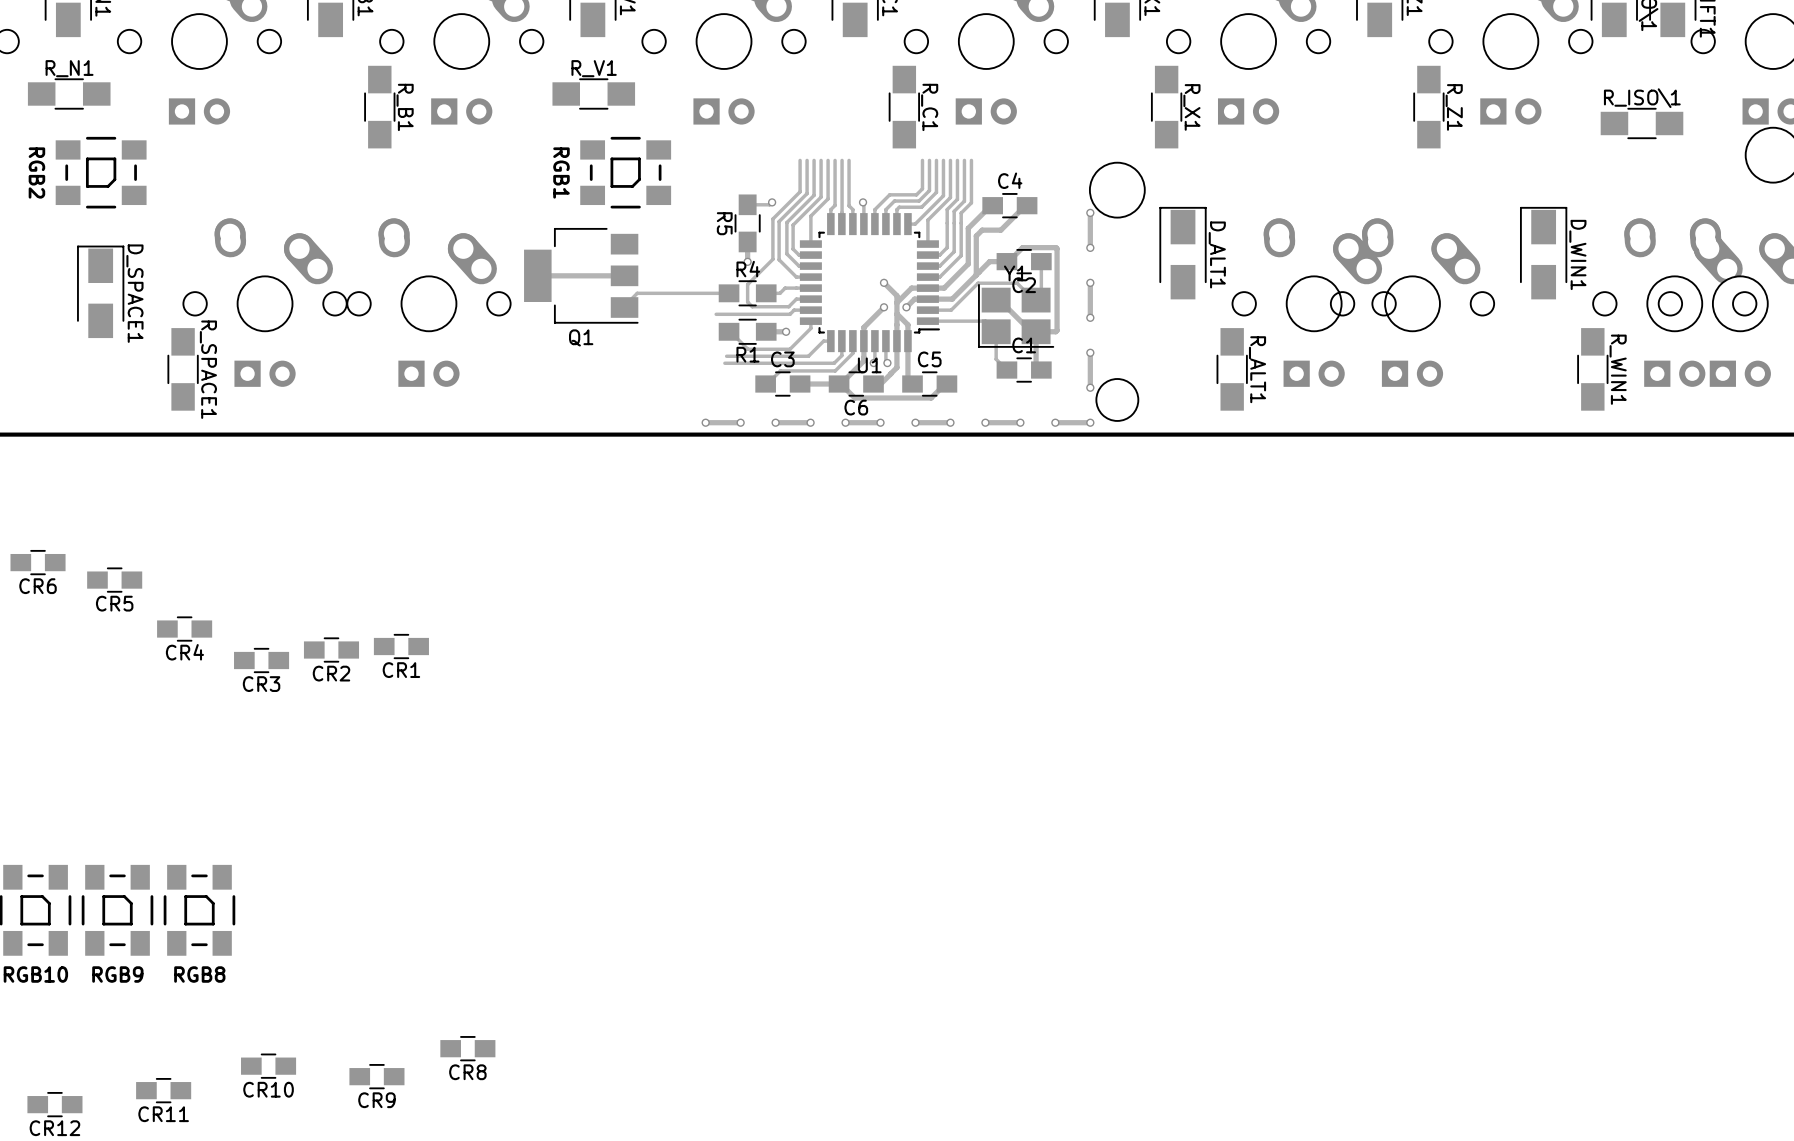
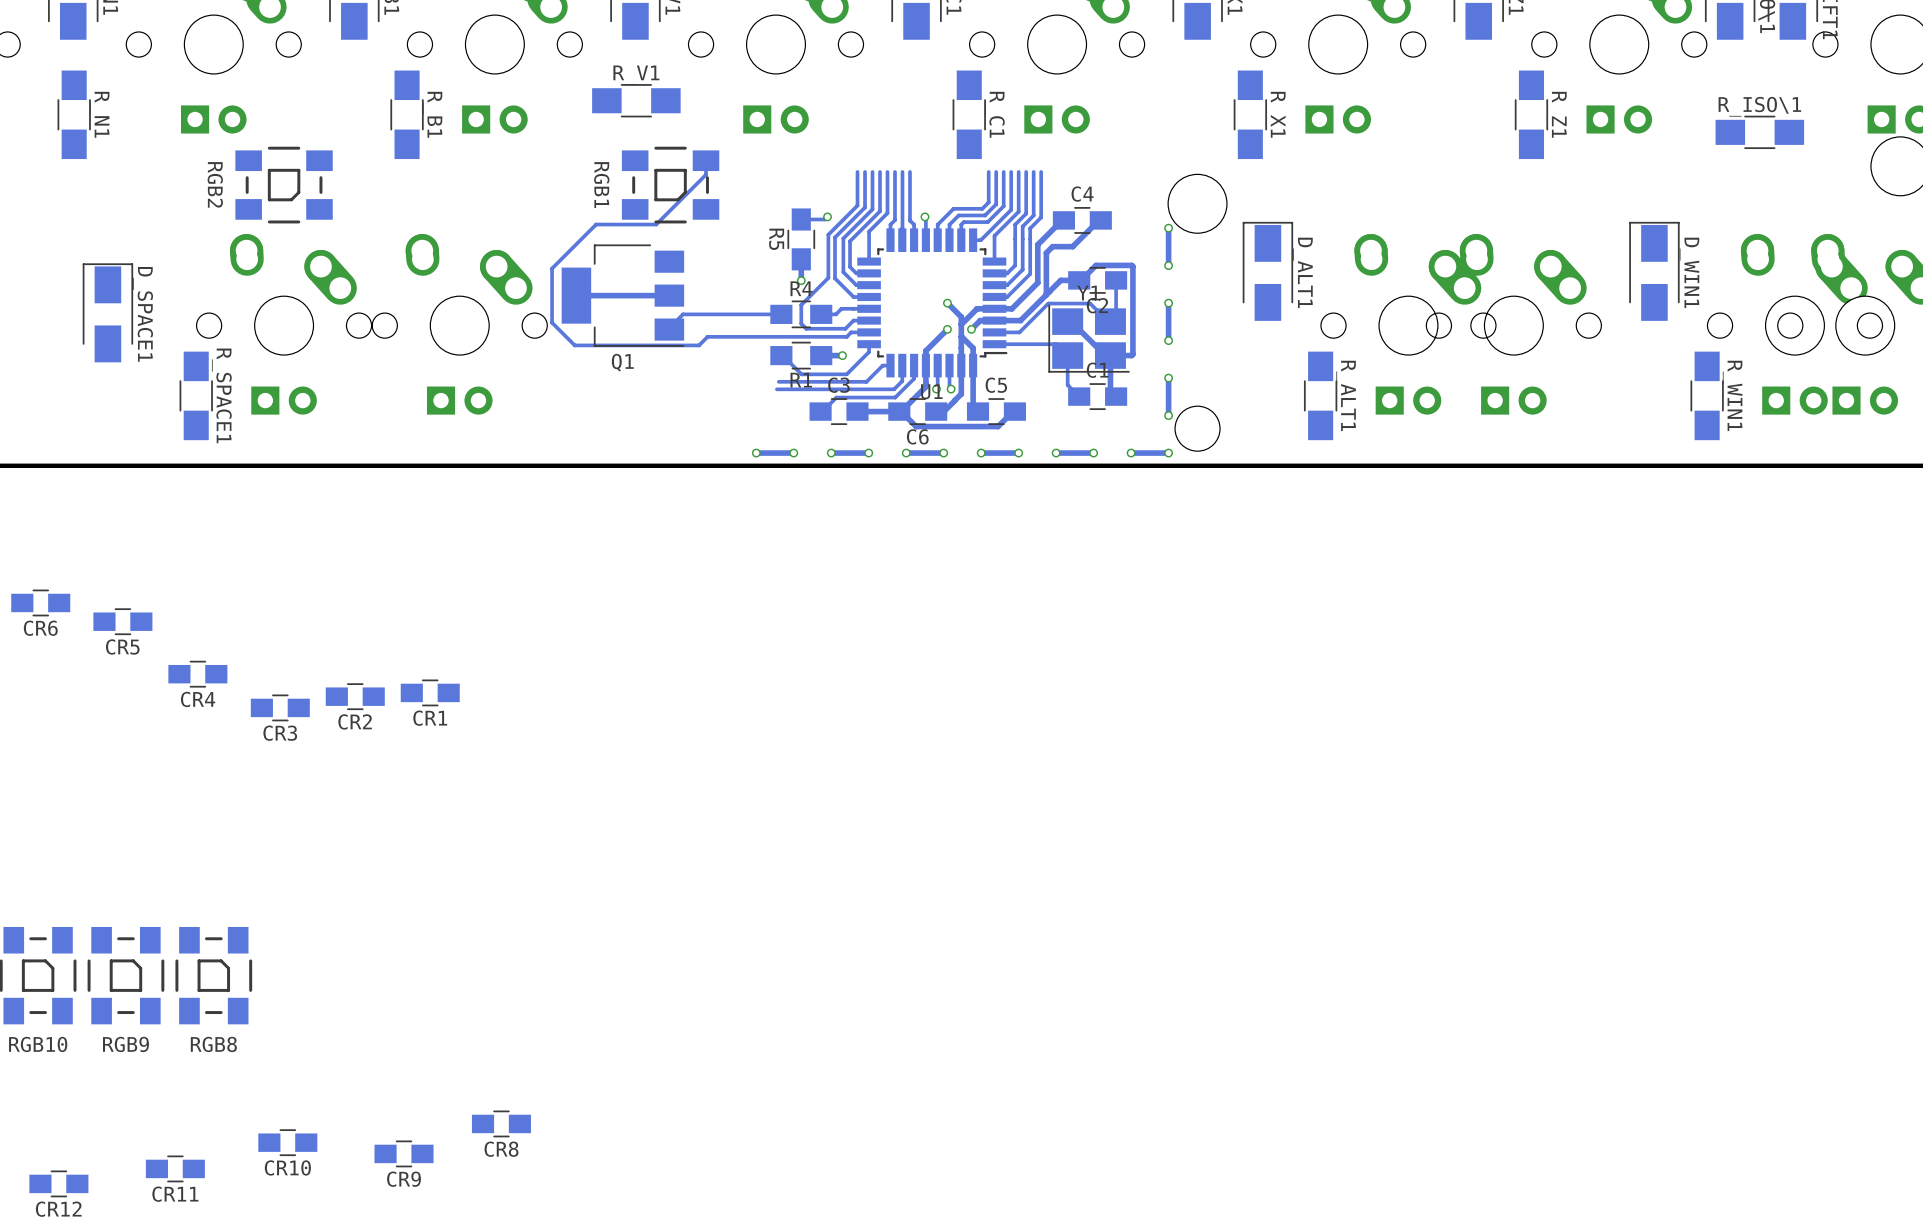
R_N1 rotation: 0° (69, 93) -> 90° clockwise (74, 114)
track: none -> (705, 160) (705, 174) (656, 224) (596, 224) (552, 268) (552, 322) (574, 345) (699, 345) (707, 336) (767, 336)
RGB2 position: (101, 172) -> (284, 185)

